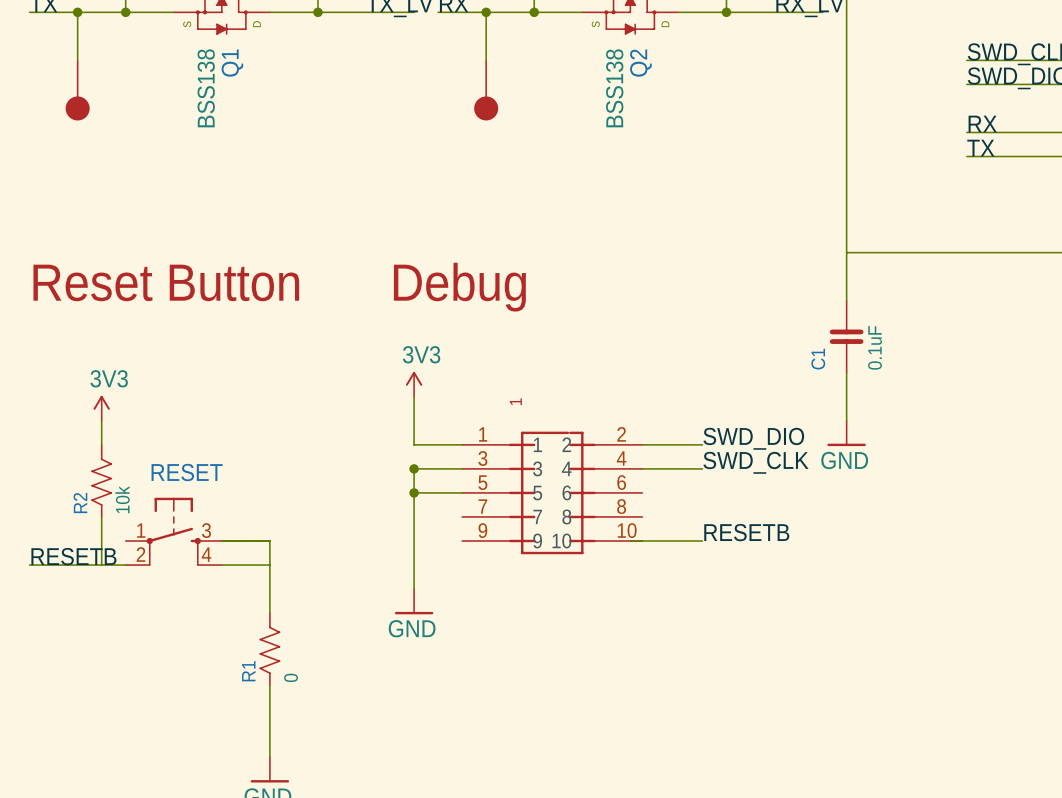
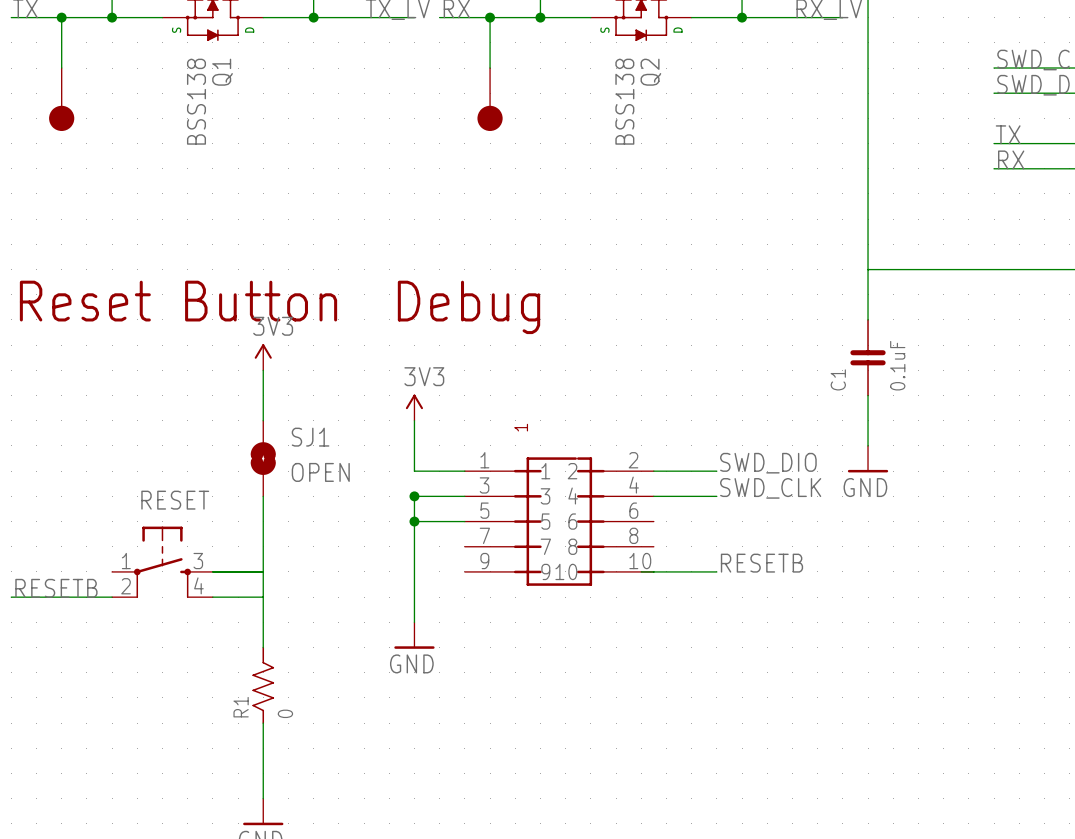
label: RX (982, 124) -> TX (1008, 134)
label: TX (980, 148) -> RX (1011, 159)
wire: none -> (263, 370) (263, 420)
power symbol position: 3V3 (101, 408) -> 3V3 (263, 357)
wire: (101, 420) (101, 444) -> none
SJ1: none -> OPEN (263, 458)
wire: none -> (263, 496) (263, 571)
R2: 10k (101, 480) -> none
wire: (101, 516) (101, 565) -> none

